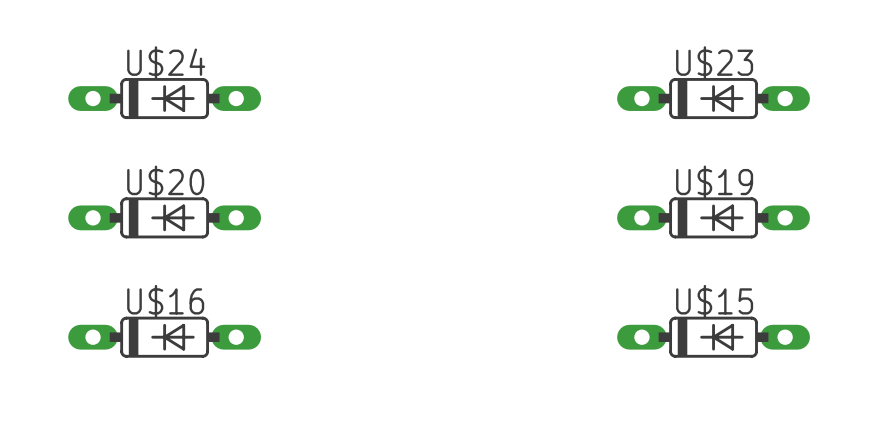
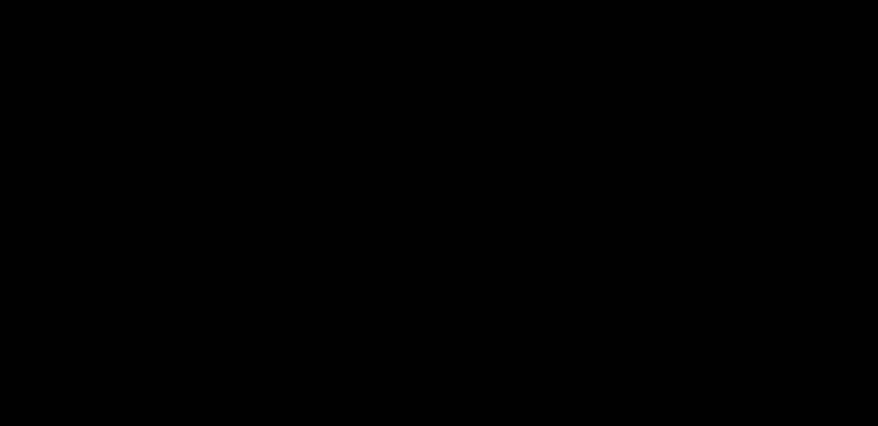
U$24: (164, 98) -> none
U$23: (713, 98) -> none
U$20: (164, 217) -> none
U$19: (713, 217) -> none
U$16: (164, 337) -> none
U$15: (713, 337) -> none

